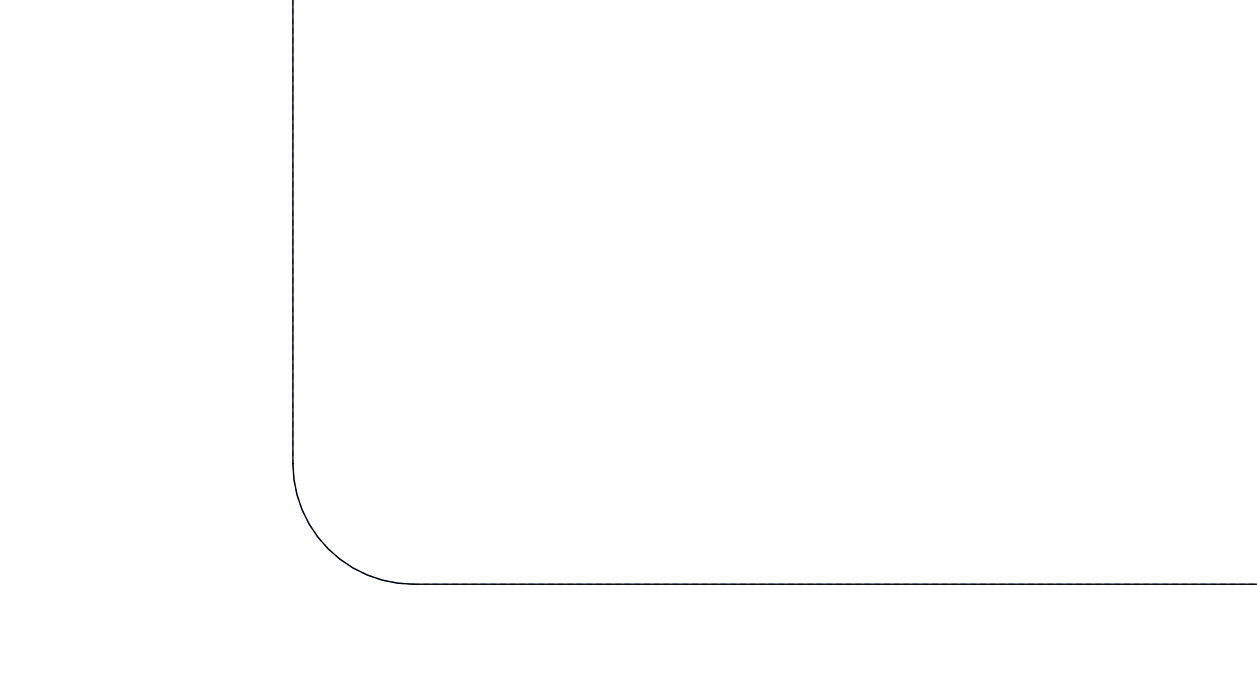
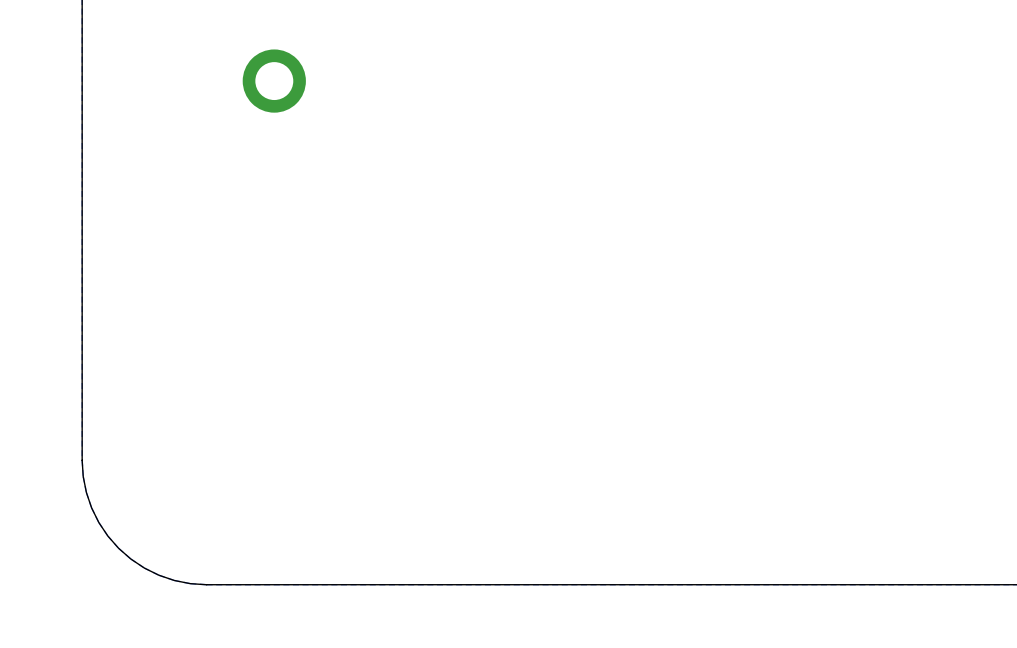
via: none -> (274, 81)

